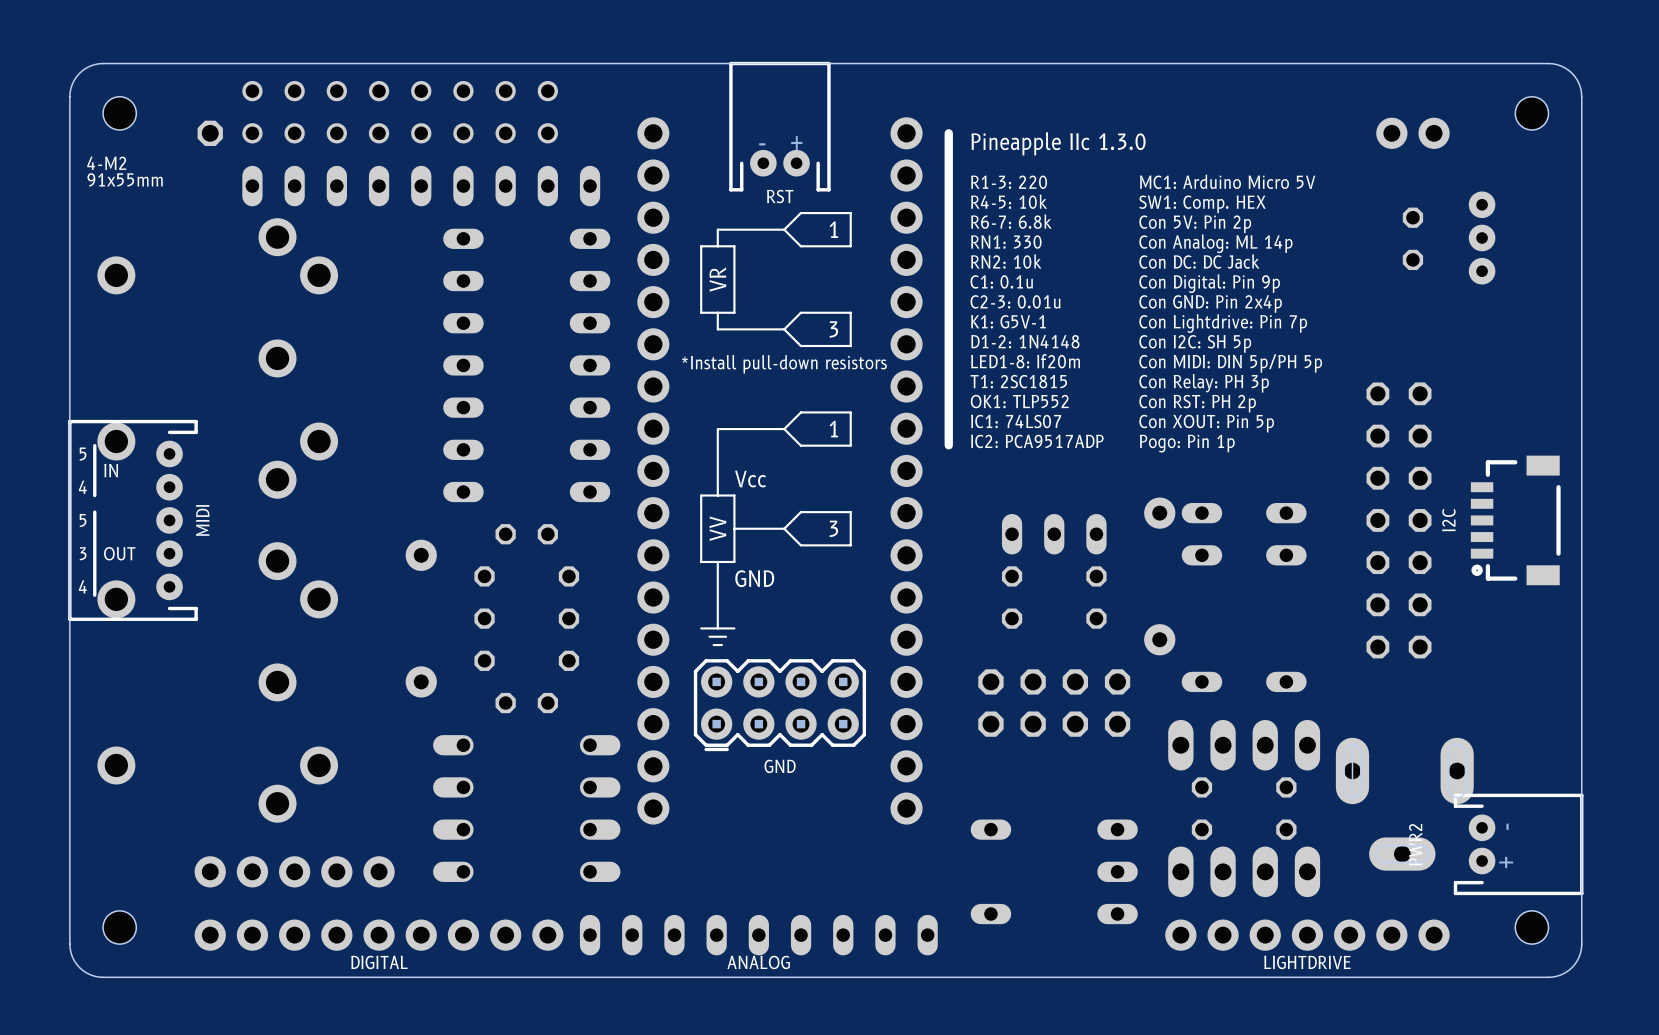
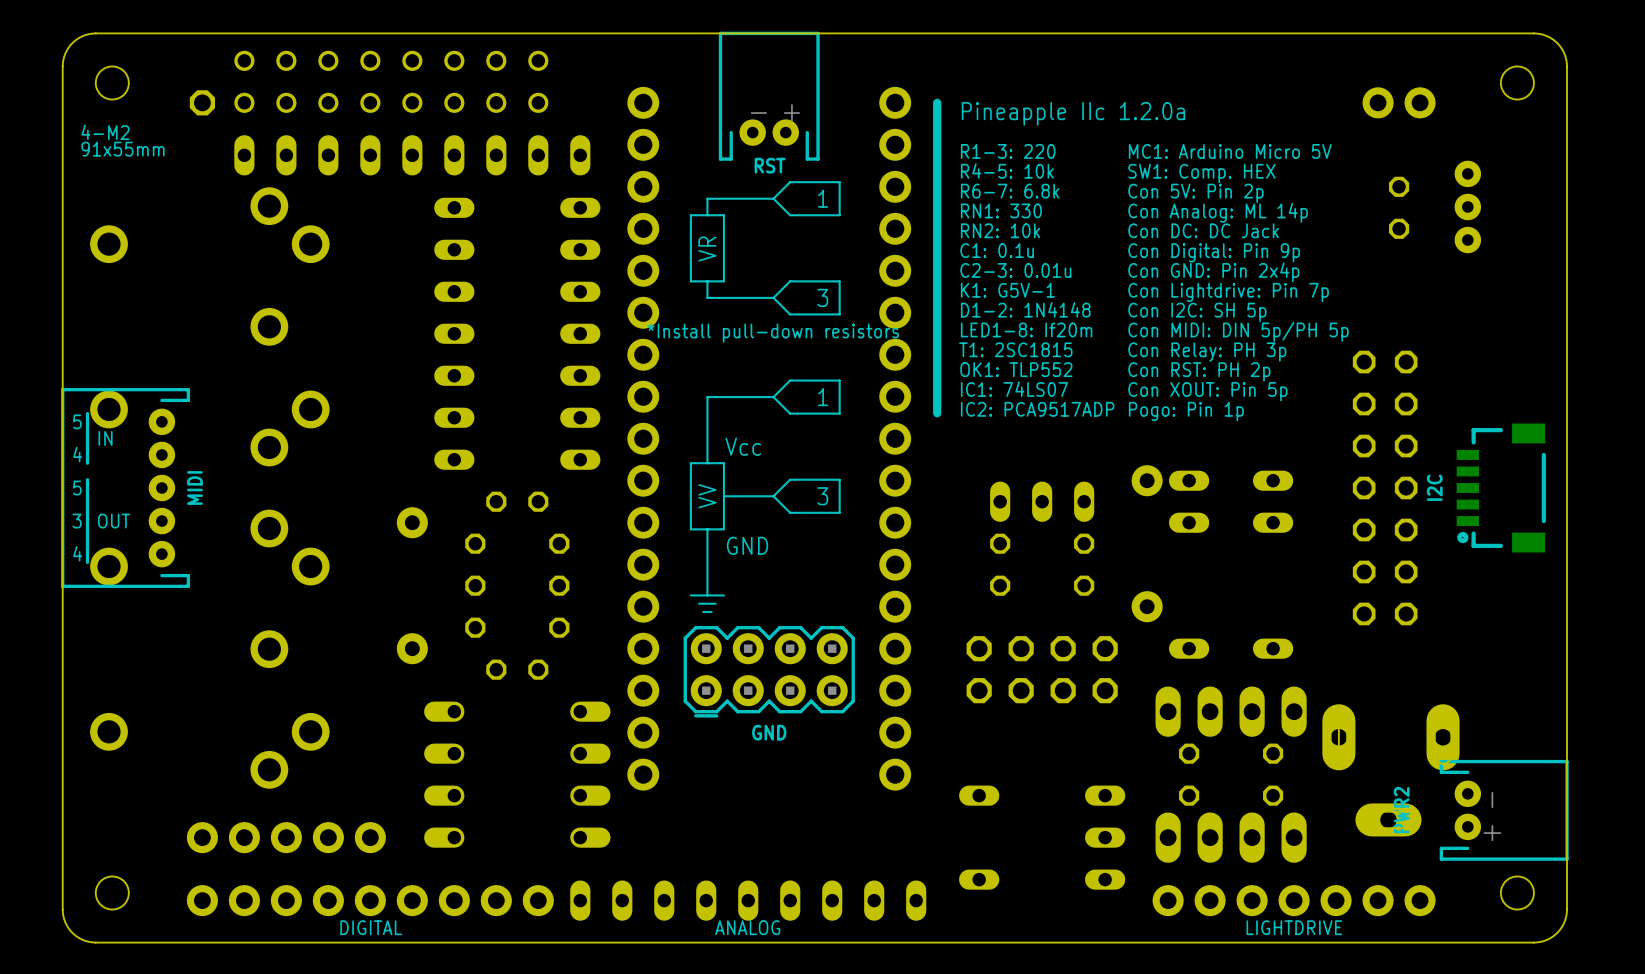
text: Pineapple IIc 1.3.0 (1058, 143) -> Pineapple IIc 1.2.0a (1073, 113)

